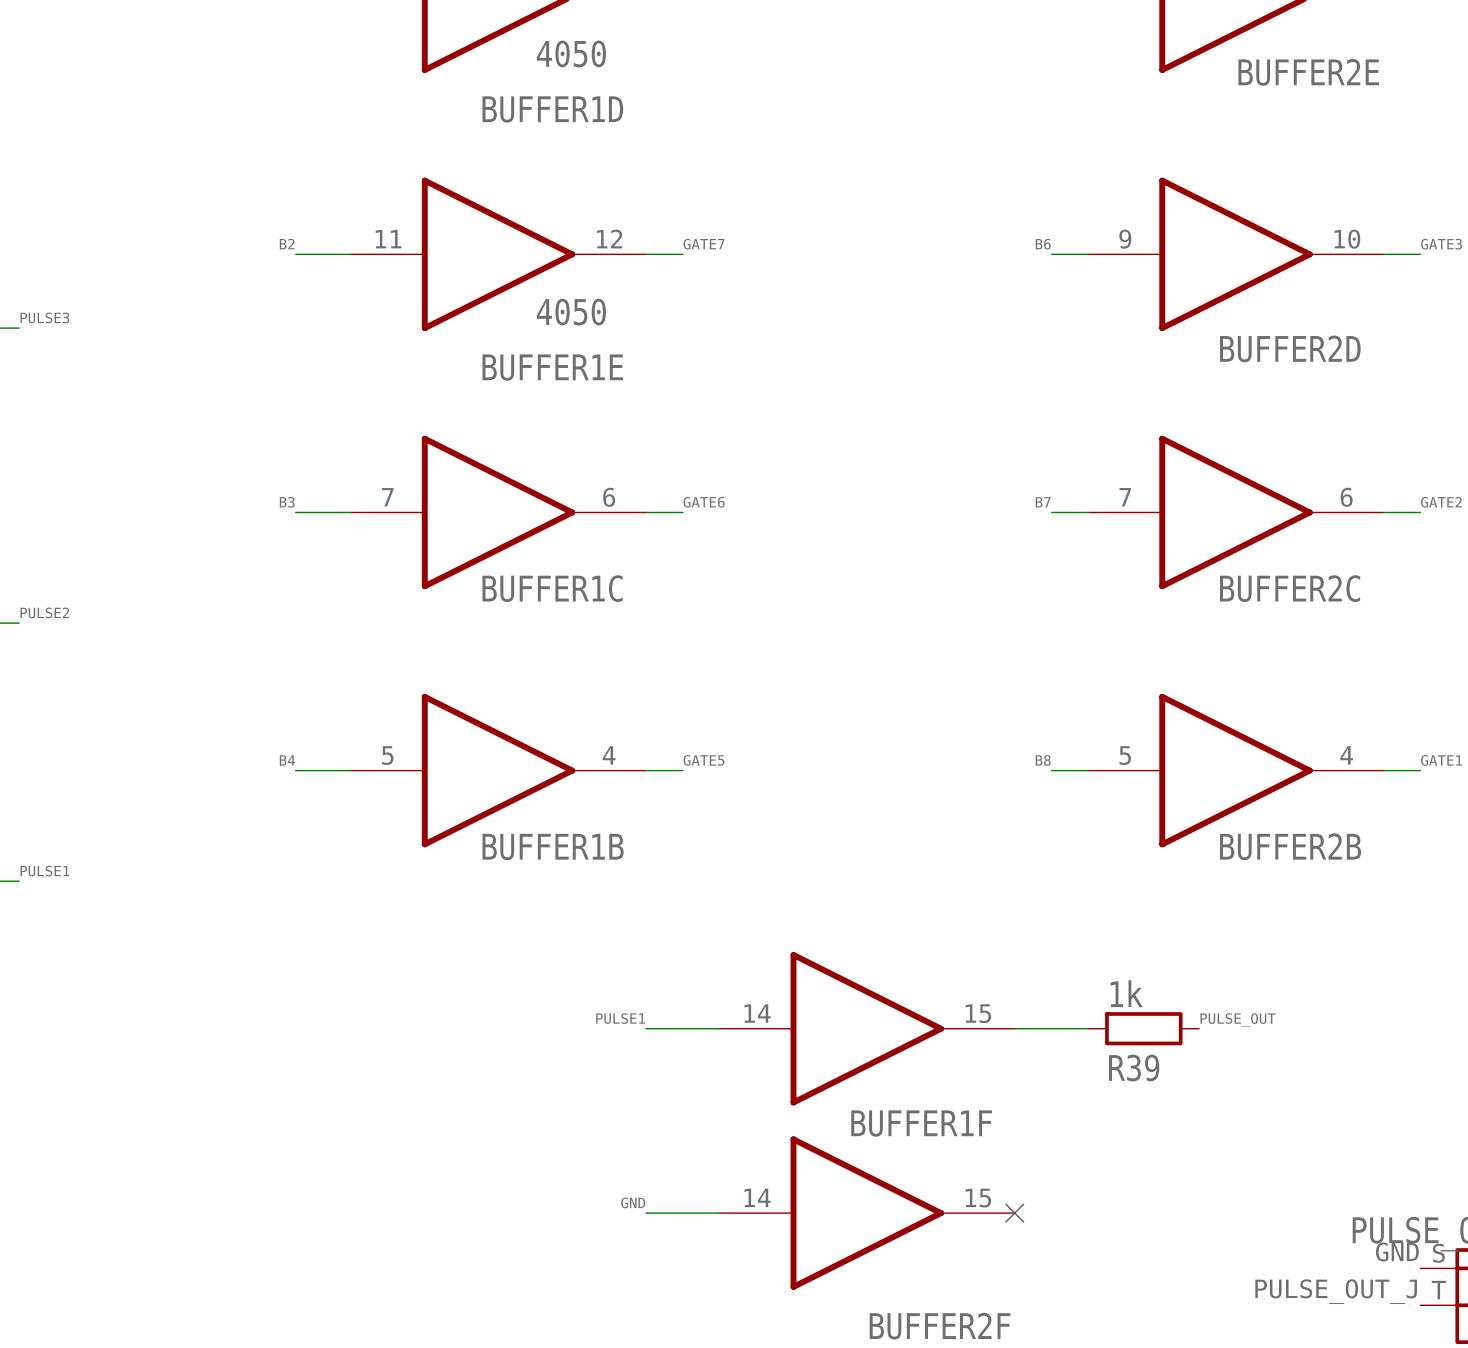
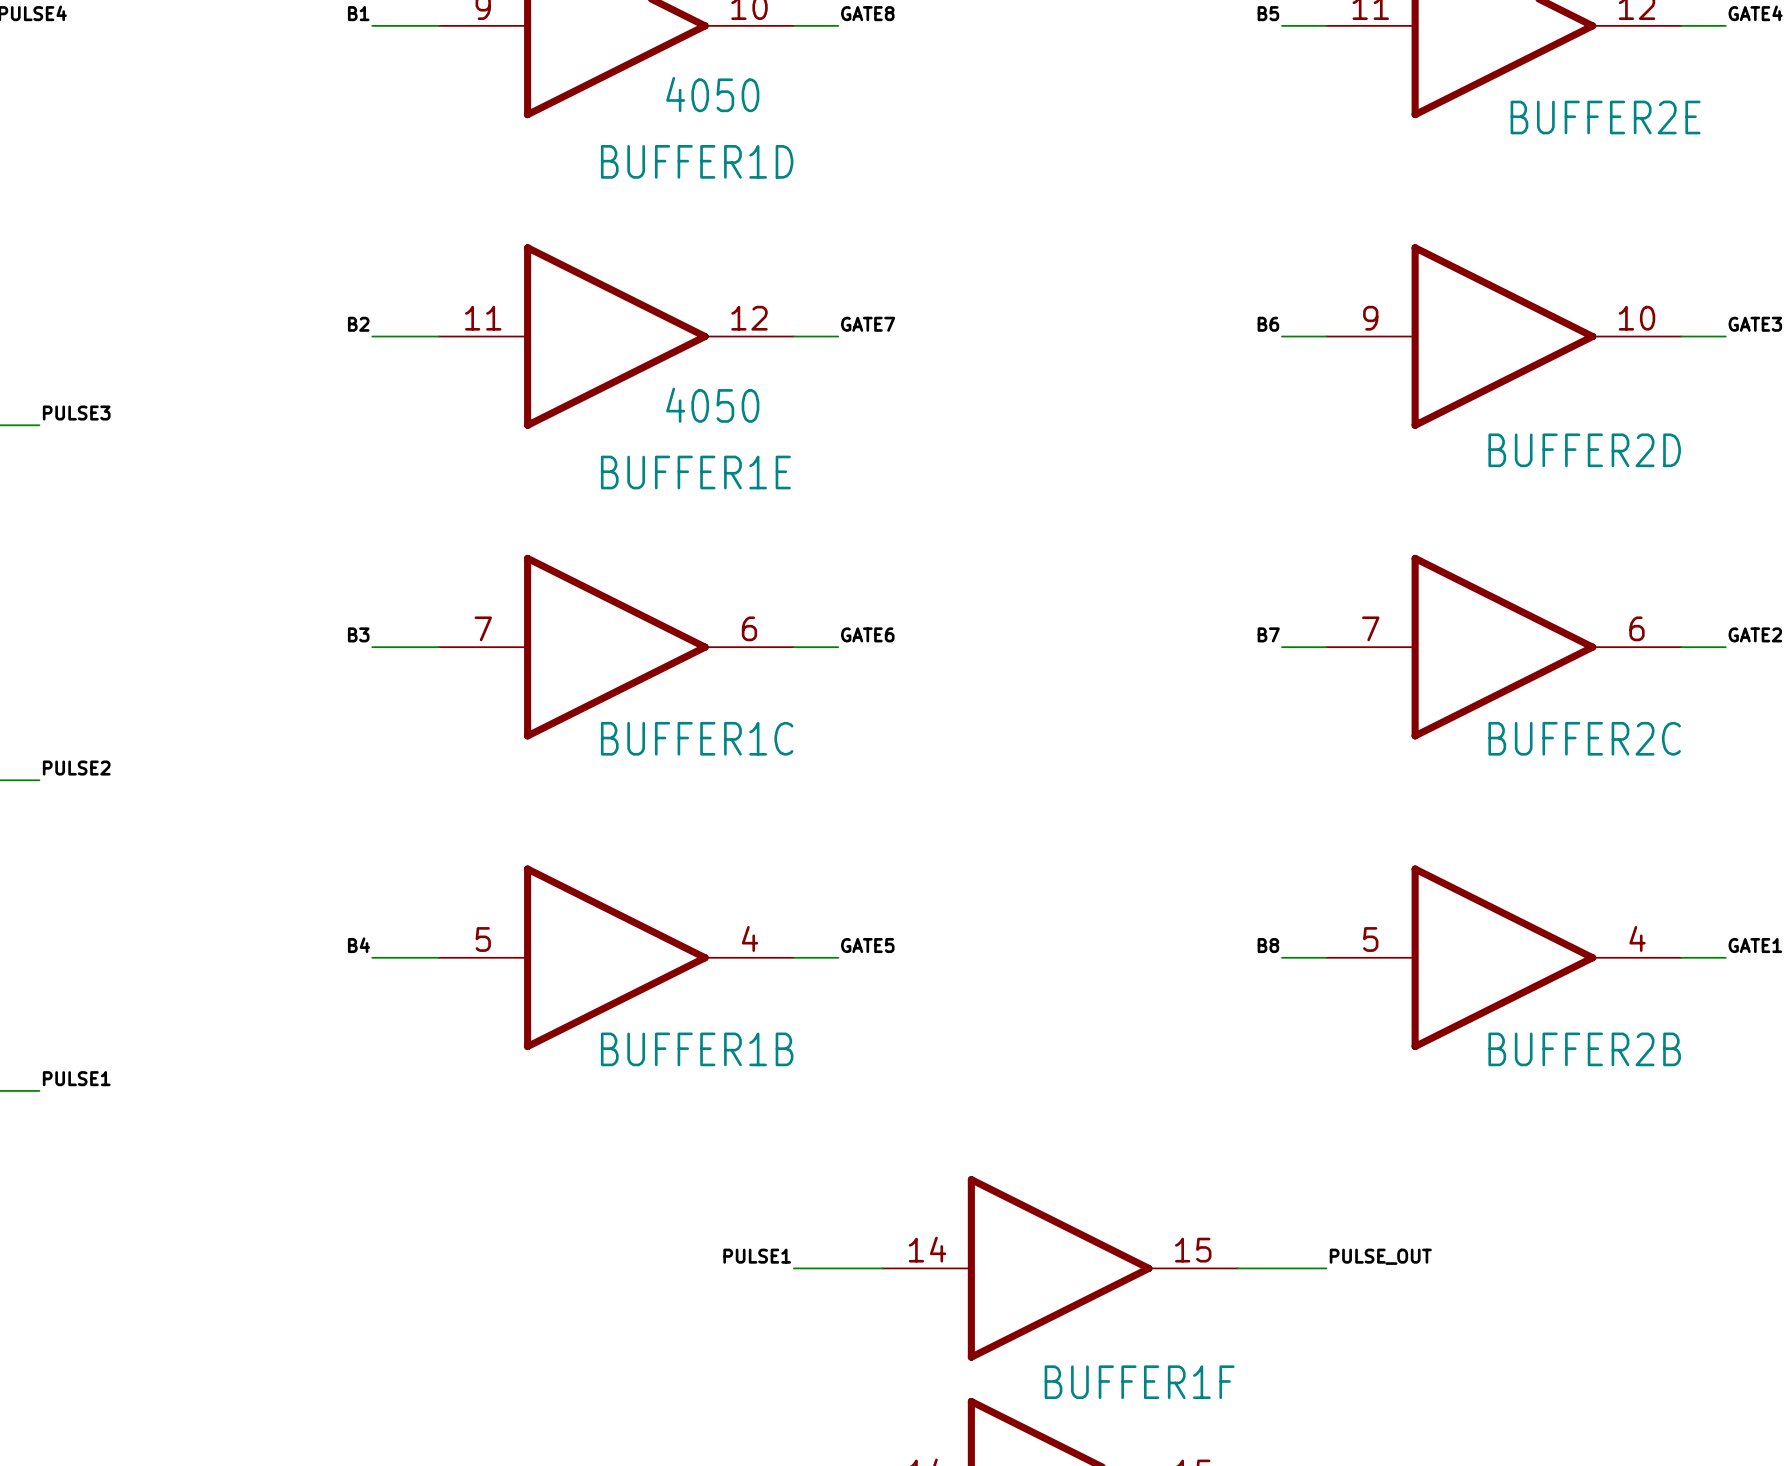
label position: PULSE_OUT (1238, 1020) -> PULSE_OUT (1380, 1256)
R39: 1k (1143, 1028) -> none

